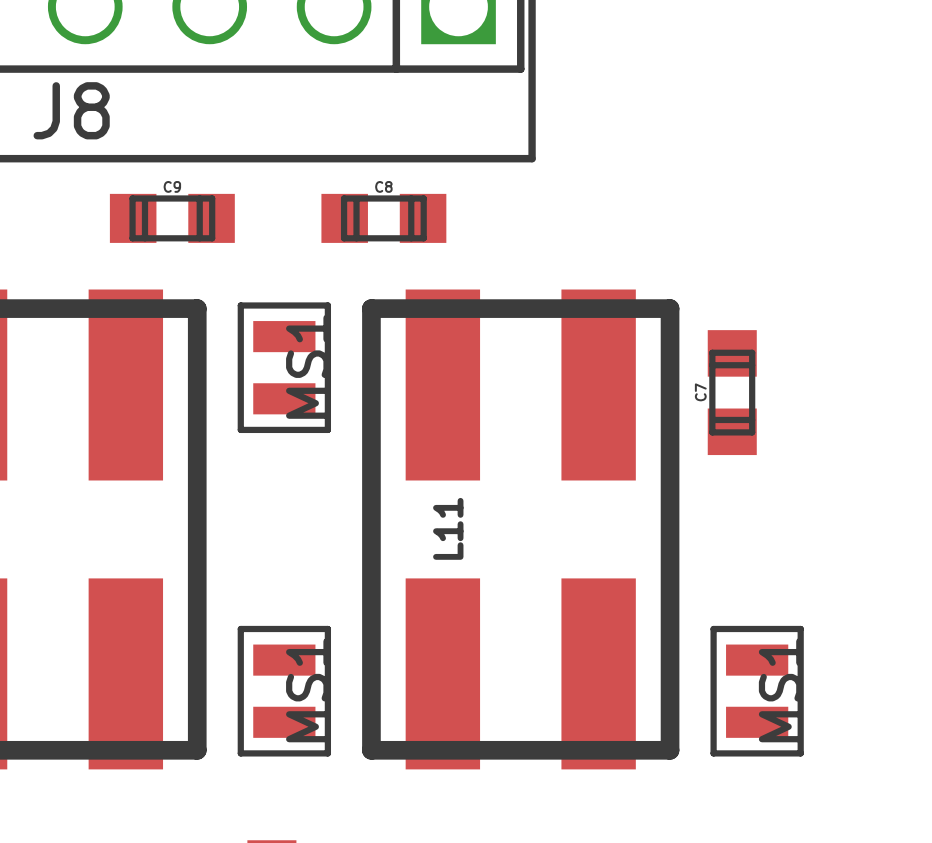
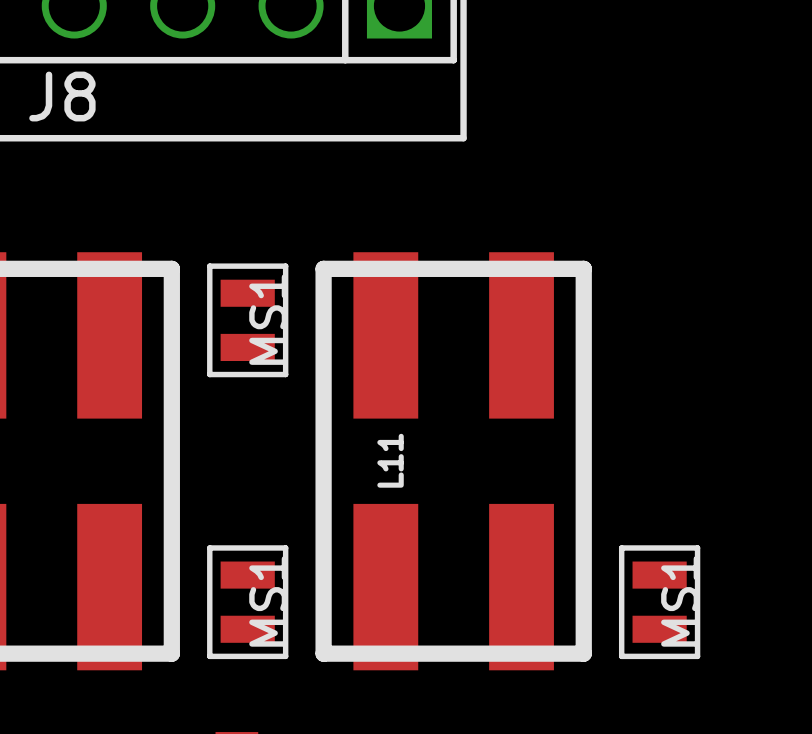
C9: (172, 218) -> none
C8: (383, 218) -> none
C7: (732, 392) -> none

